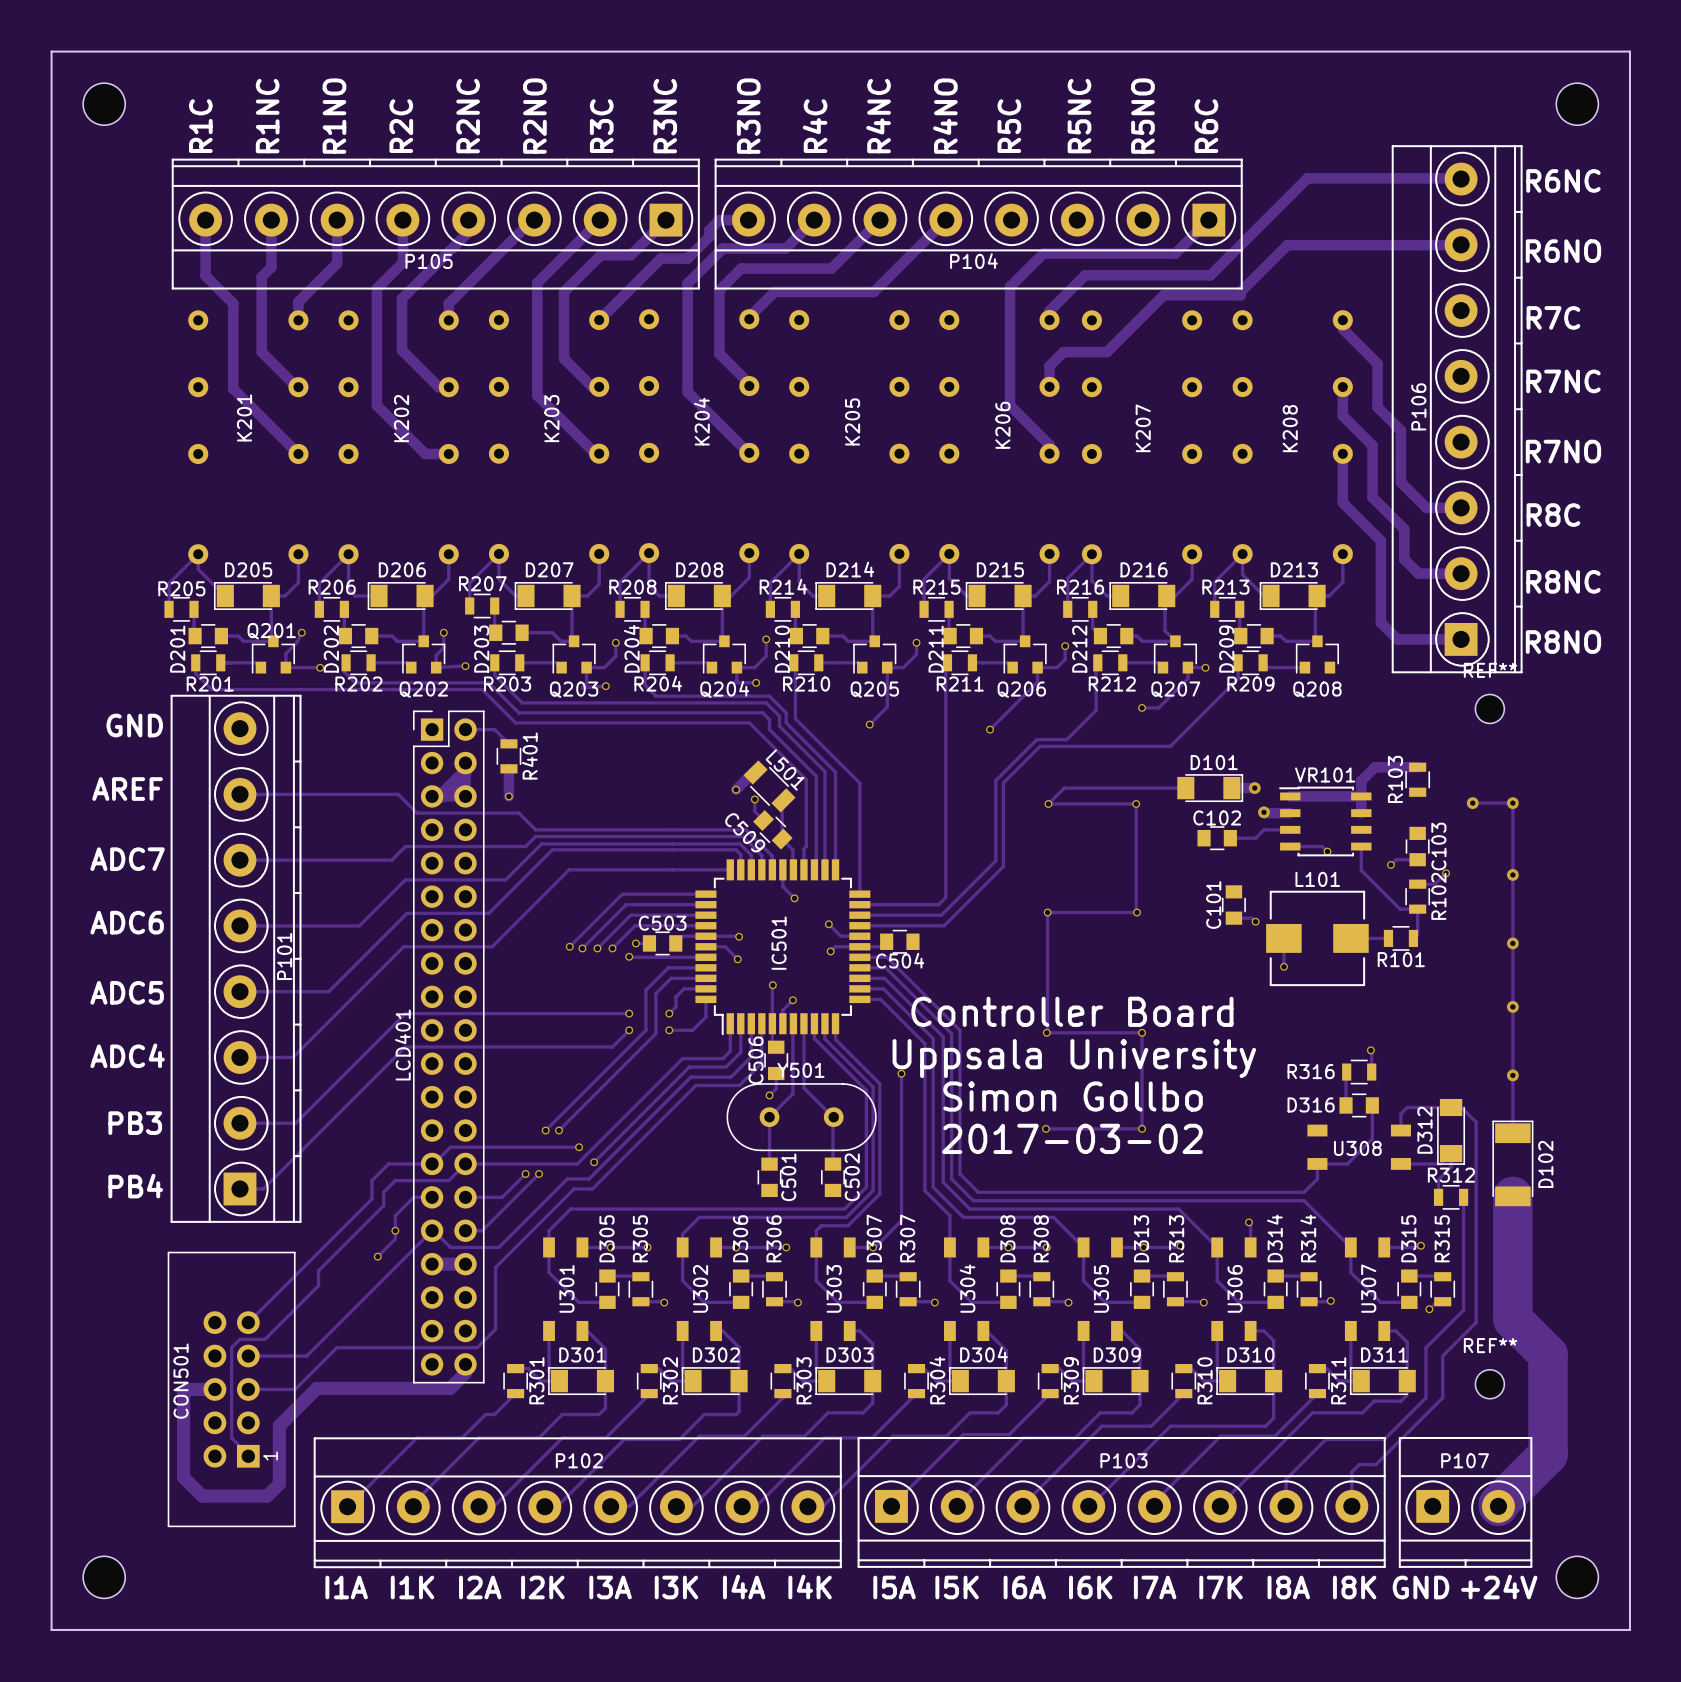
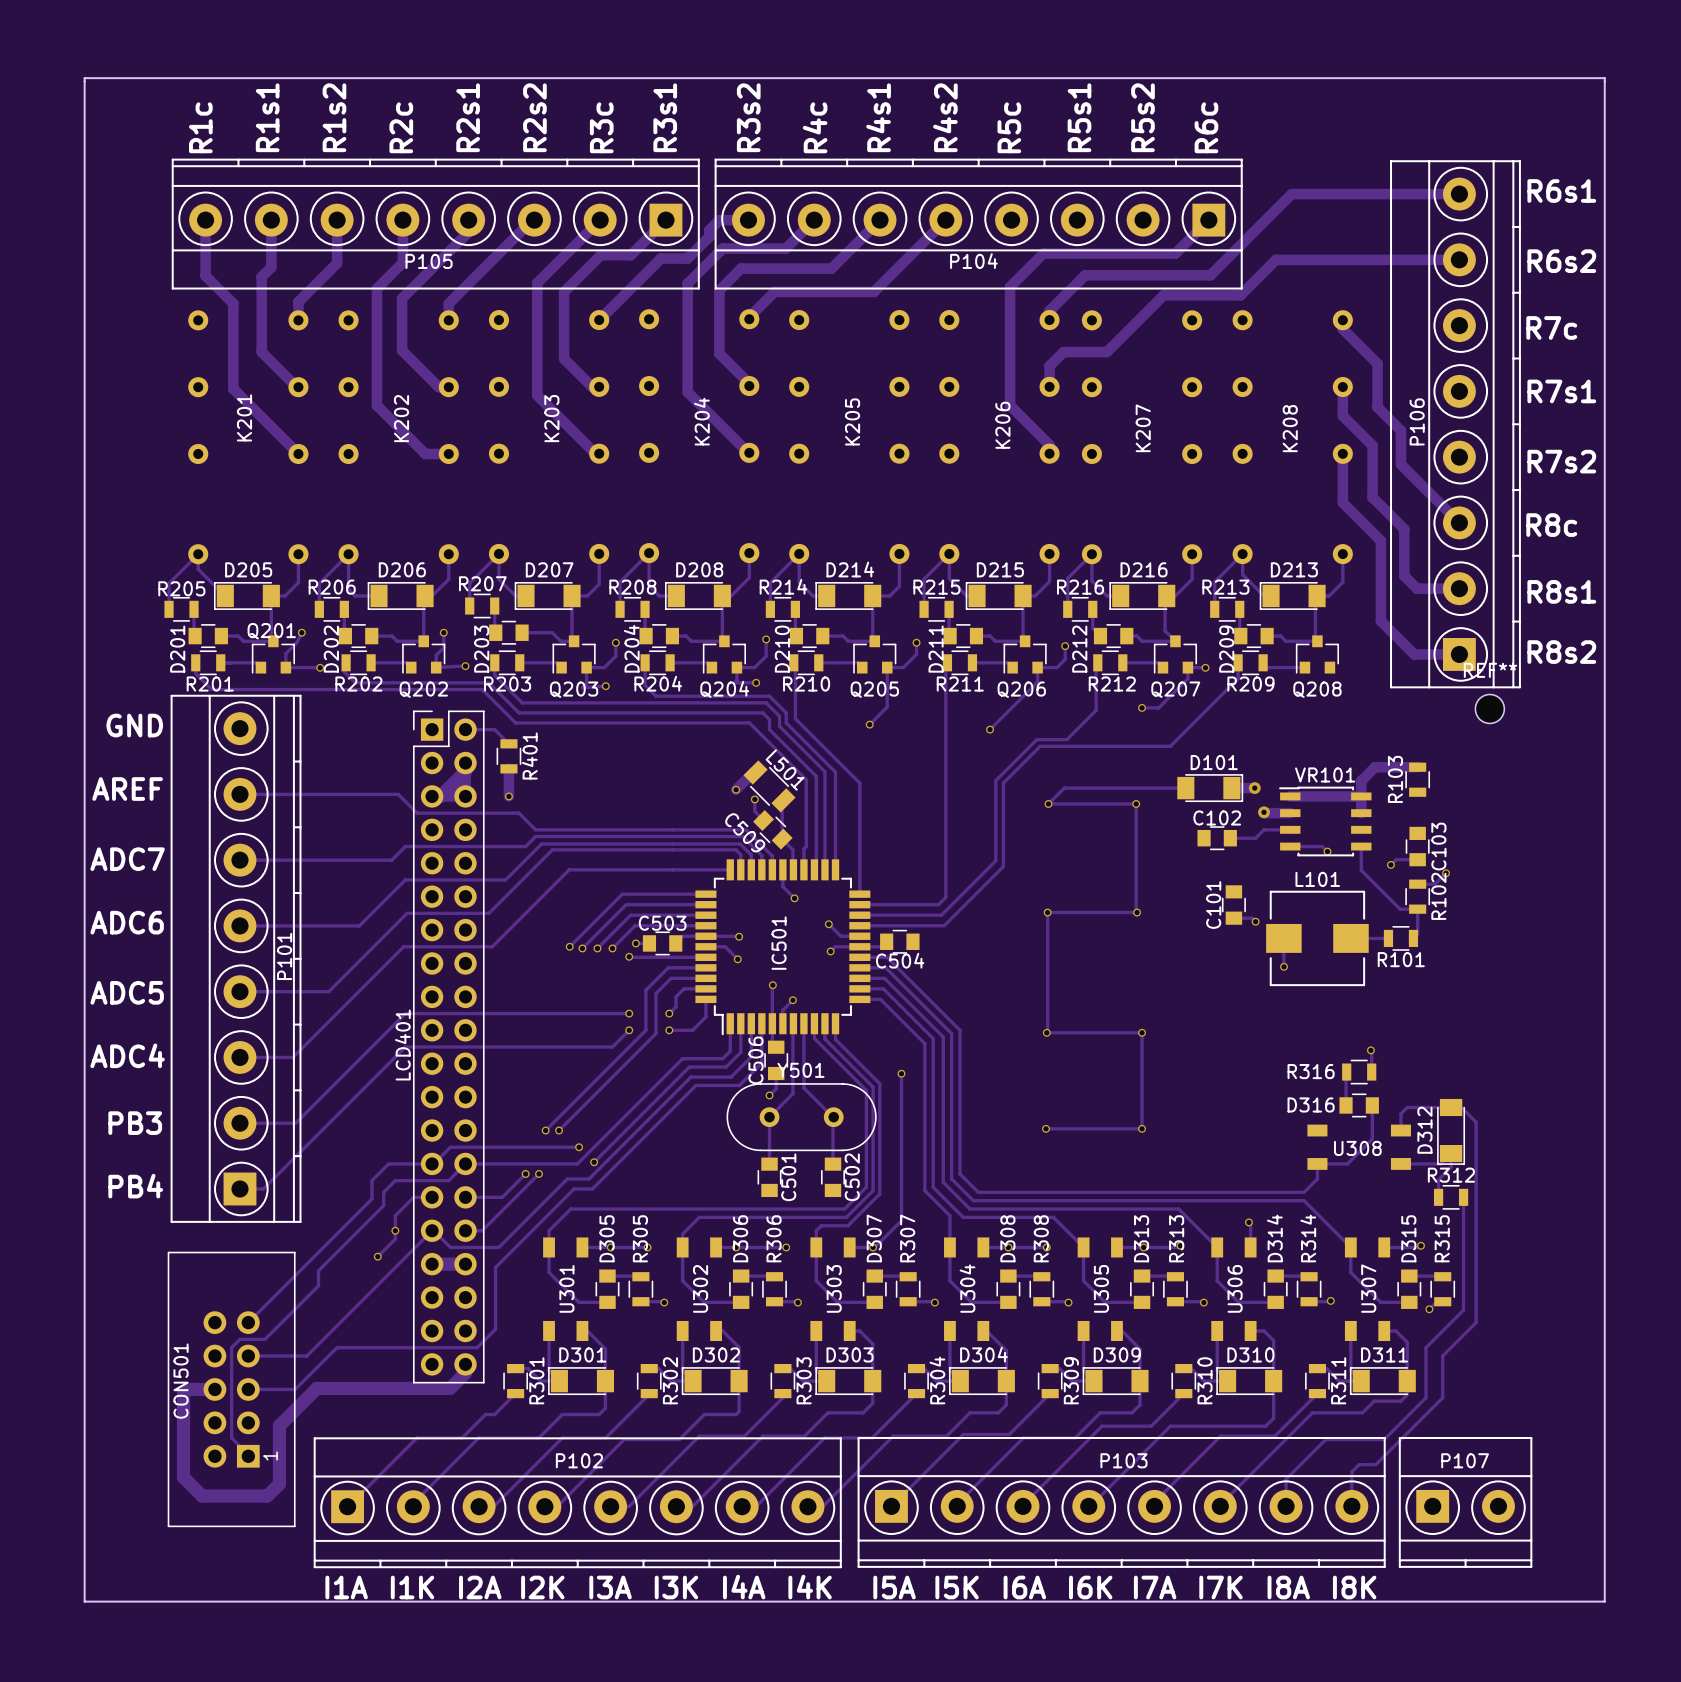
board edge: (51, 51) (51, 1629) (1629, 1629) (1629, 51) (51, 51) -> (84, 78) (84, 1601) (1604, 1601) (1604, 78) (84, 78)
part: (104, 104) -> none
part: (1577, 104) -> none
text: R1NC (267, 116) -> R1s1 (267, 117)
text: R1NO (334, 116) -> R1s2 (334, 117)
text: R2NC (468, 116) -> R2s1 (468, 117)
text: R2NO (534, 116) -> R2s2 (534, 117)
text: R3NC (665, 116) -> R3s1 (665, 117)
text: R3NO (748, 116) -> R3s2 (748, 117)
text: R4NC (878, 116) -> R4s1 (878, 117)
text: R4NO (945, 116) -> R4s2 (945, 117)
text: R5NC (1079, 116) -> R5s1 (1079, 117)
text: R5NO (1142, 116) -> R5s2 (1142, 117)
text: R1C (200, 126) -> R1c (200, 127)
text: R2C (401, 126) -> R2c (401, 127)
text: R3C (601, 126) -> R3c (601, 127)
text: R4C (815, 126) -> R4c (815, 127)
text: R5C (1009, 126) -> R5c (1009, 127)
text: R6C (1206, 126) -> R6c (1206, 127)
track: (1461, 179) (1307, 178) (1291, 194) -> (1459, 194) (1291, 194)
text: R6NC (1563, 180) -> R6s1 (1561, 190)
track: (1461, 244) (1287, 245) (1240, 291) (1240, 295) -> (1459, 259) (1276, 259) (1240, 295)
text: R6NO (1563, 251) -> R6s2 (1561, 261)
text: R7C (1553, 317) -> R7c (1551, 327)
text: R7NC (1563, 381) -> R7s1 (1561, 391)
P106 position: (1457, 409) -> (1455, 424)
text: R7NO (1563, 451) -> R7s2 (1561, 461)
track: (1400, 464) (1400, 482) (1426, 507) (1461, 507) -> (1400, 464) (1459, 522)
text: R8C (1553, 515) -> R8c (1551, 525)
track: (1404, 559) (1418, 573) (1461, 573) -> (1404, 559) (1404, 575) (1417, 588) (1459, 588)
text: R8NC (1563, 581) -> R8s1 (1561, 591)
track: (1380, 621) (1397, 639) (1461, 639) -> (1380, 621) (1414, 654) (1459, 654)
text: R8NO (1563, 642) -> R8s2 (1561, 652)
track: (1472, 803) (1512, 803) (1512, 1133) -> none
via: (1472, 803) -> none
via: (1512, 803) -> none
via: (1512, 874) -> none
via: (1512, 943) -> none
via: (1512, 1006) -> none
text: Controller Board (1072, 1011) -> none
text: Uppsala University (1074, 1058) -> none
via: (1512, 1075) -> none
text: Simon Gollbo (1073, 1096) -> none
text: 2017-03-02 (1072, 1138) -> none
D102: (1512, 1163) -> none
track: (1512, 1196) (1512, 1319) (1547, 1354) (1547, 1454) (1498, 1504) (1499, 1506) -> none
REF**: (1489, 1384) -> none
part: (104, 1577) -> none
part: (1577, 1577) -> none
text: GND (1421, 1587) -> none
text: +24V (1499, 1587) -> none

